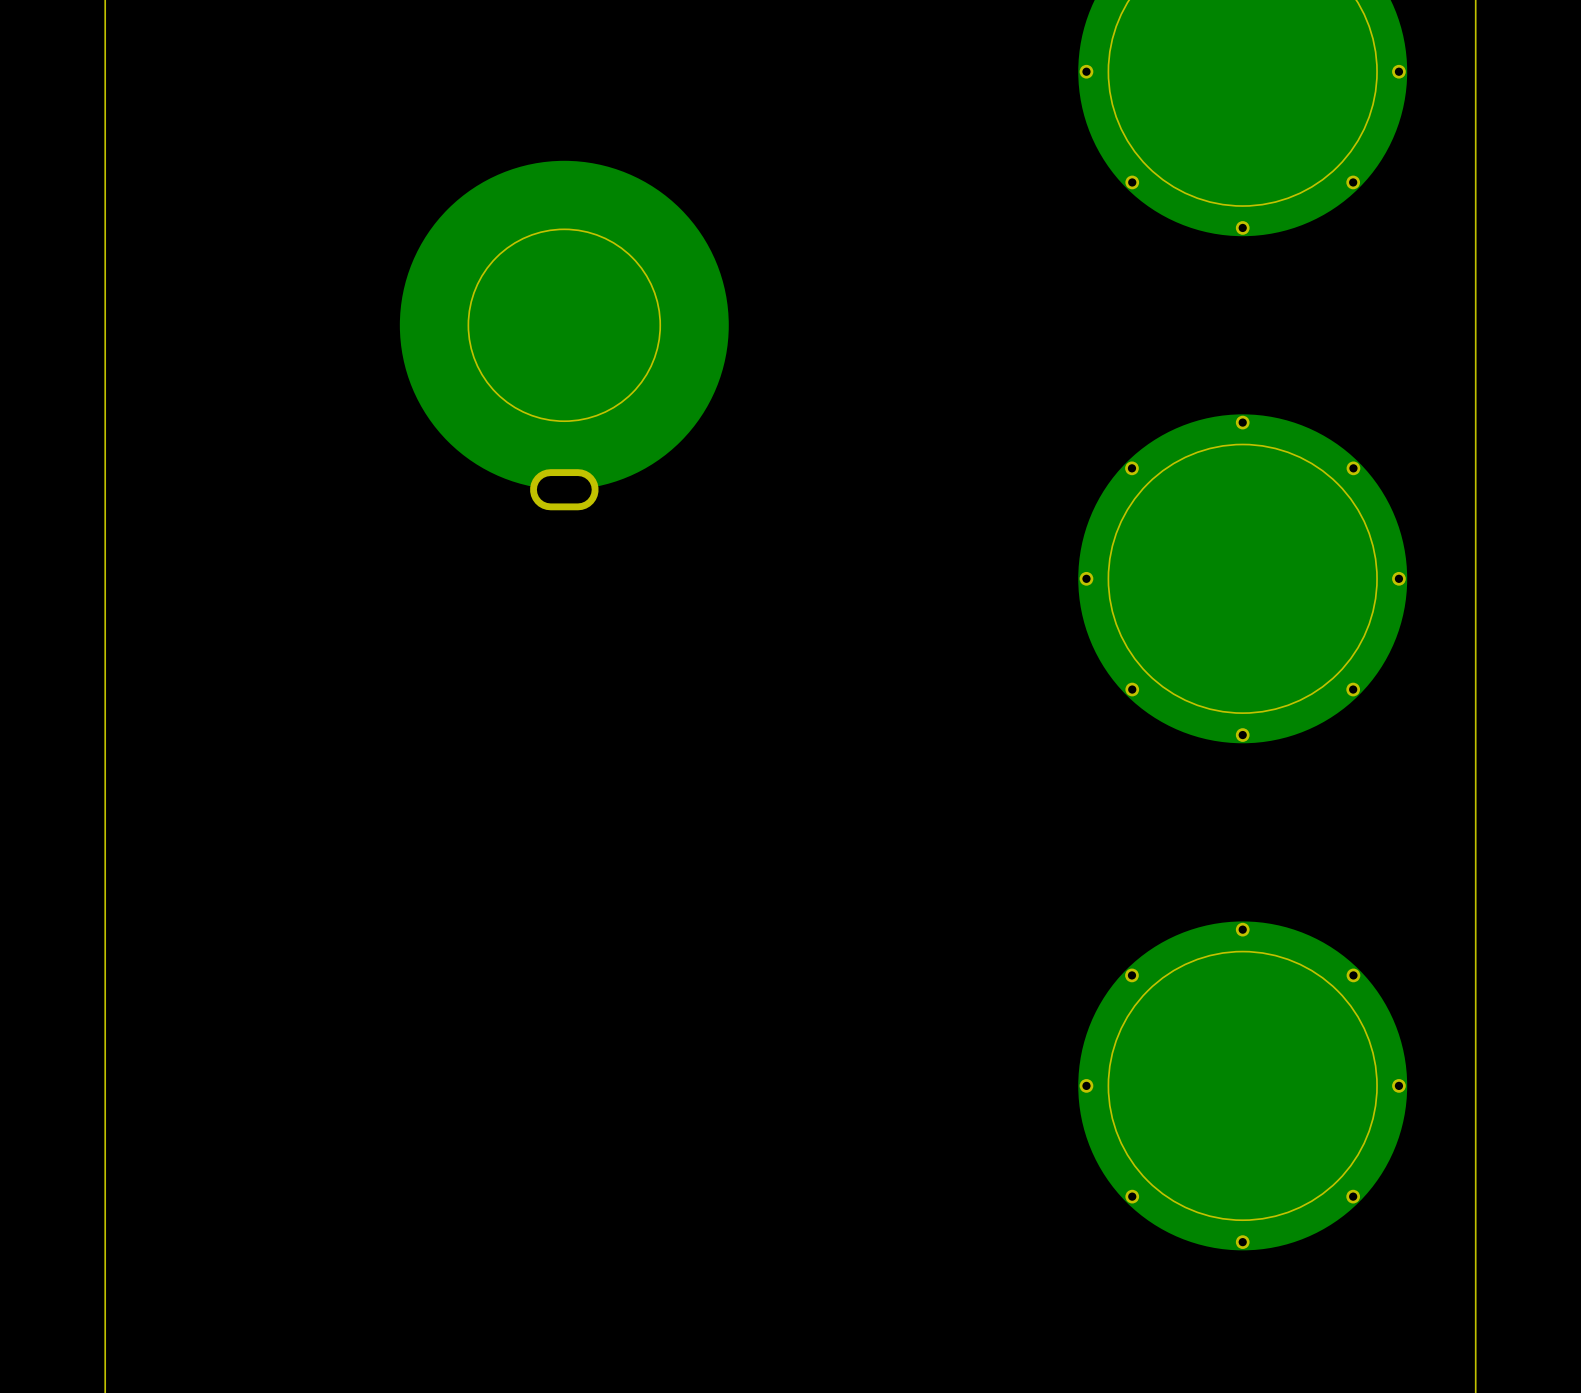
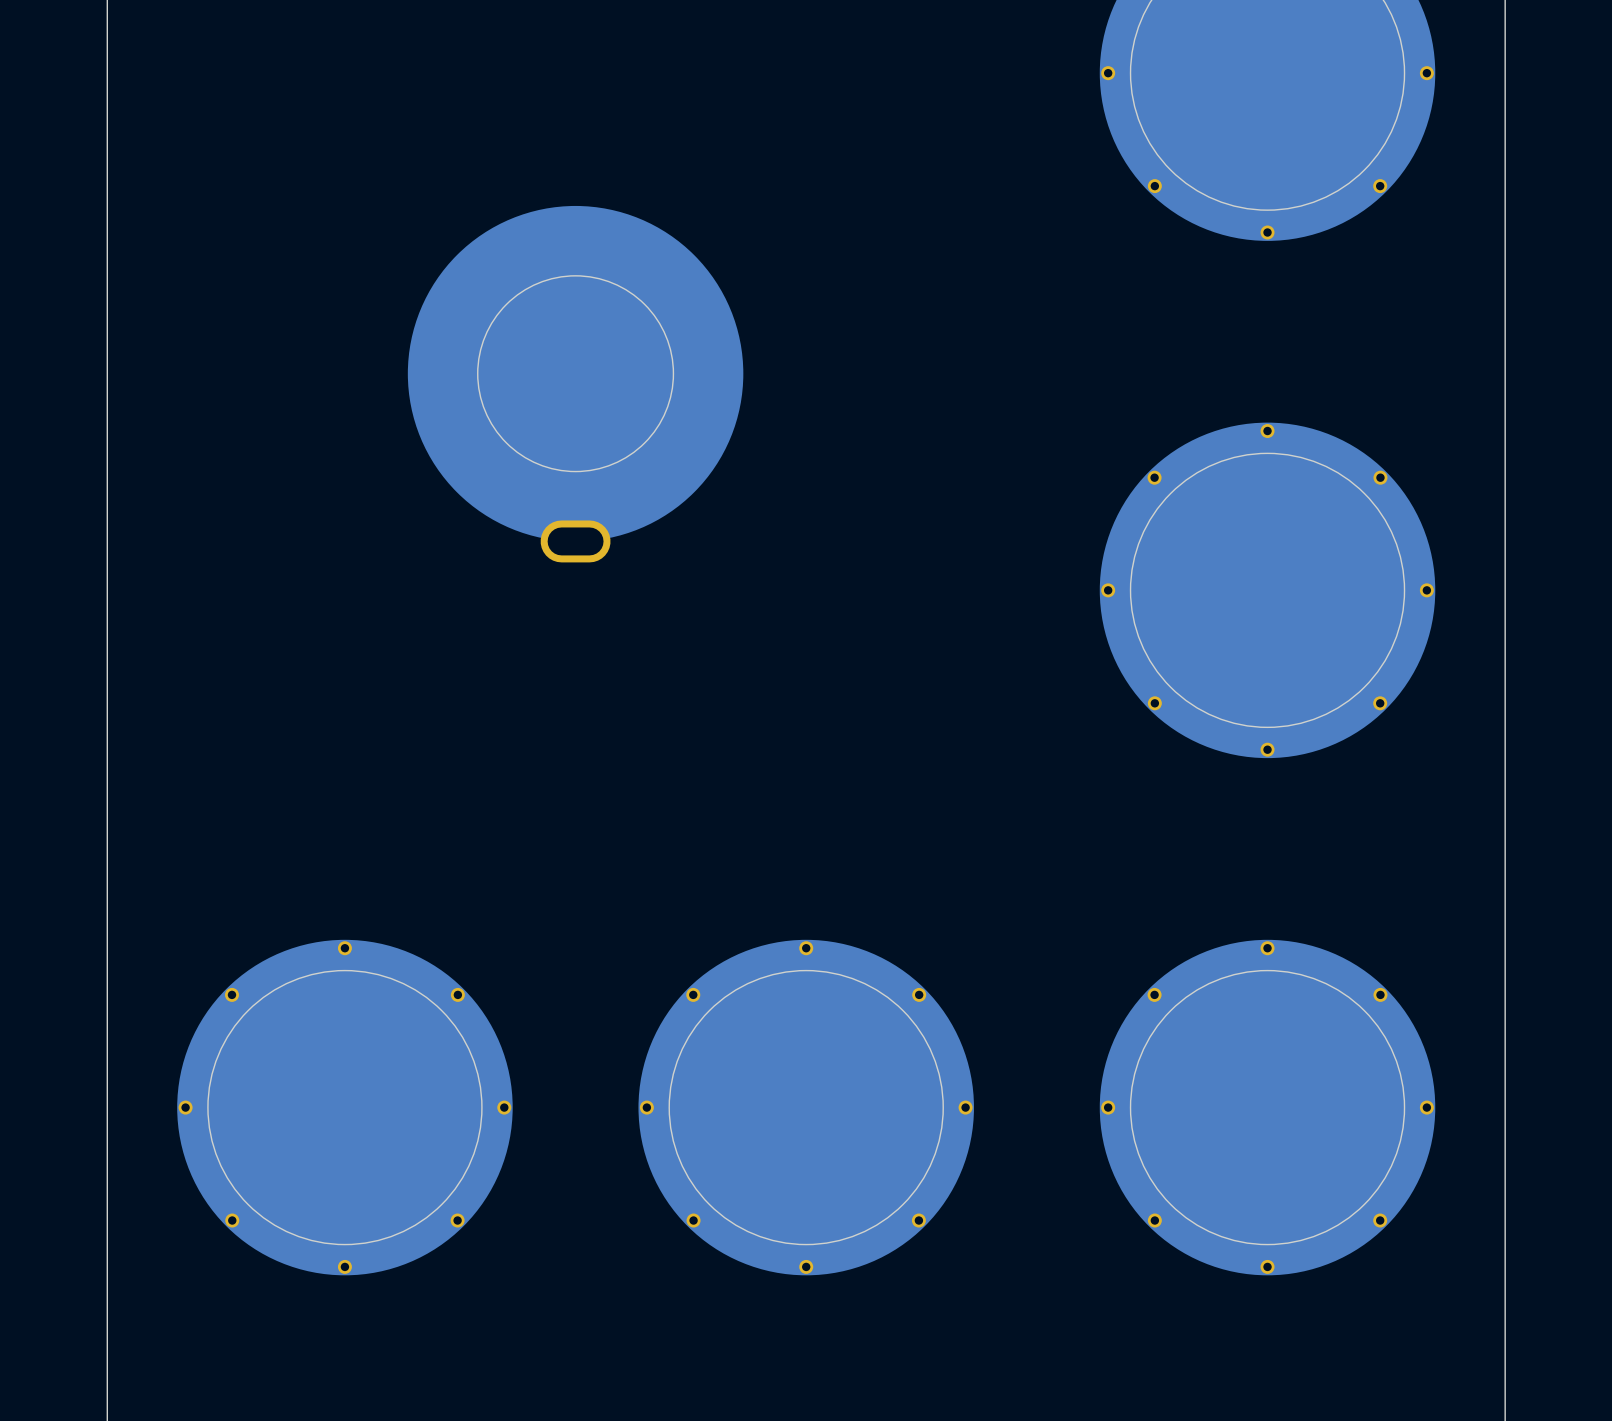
part position: (564, 335) -> (575, 384)
part: none -> (344, 1107)
part: none -> (806, 1107)

